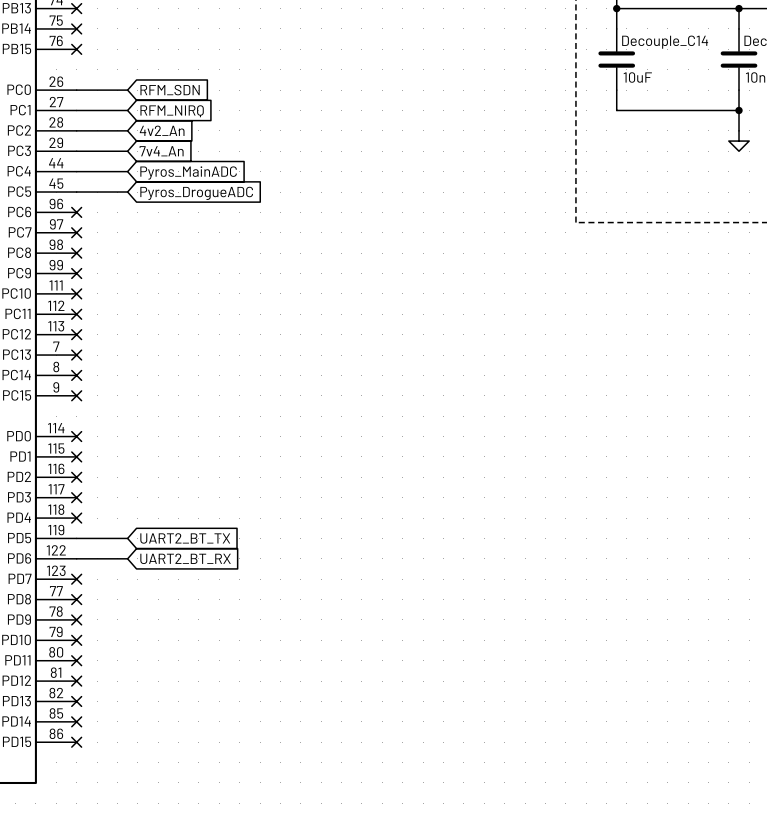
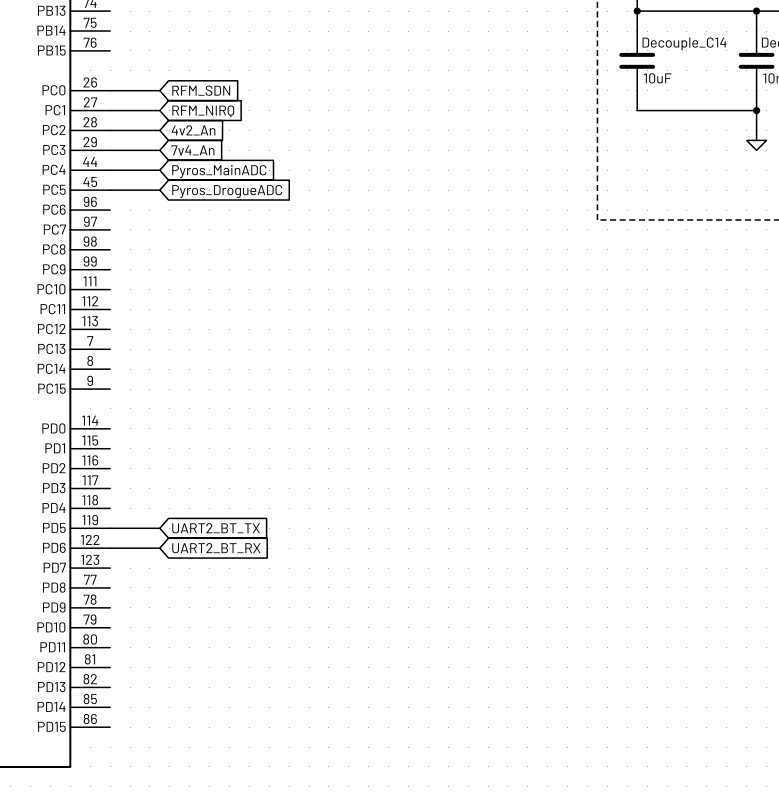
no-connect mark: (76, 8) -> none
no-connect mark: (76, 28) -> none
no-connect mark: (76, 49) -> none
no-connect mark: (76, 212) -> none
no-connect mark: (76, 232) -> none
no-connect mark: (76, 253) -> none
no-connect mark: (76, 273) -> none
no-connect mark: (76, 293) -> none
no-connect mark: (76, 314) -> none
no-connect mark: (76, 334) -> none
no-connect mark: (76, 355) -> none
no-connect mark: (76, 375) -> none
no-connect mark: (76, 395) -> none
no-connect mark: (76, 436) -> none
no-connect mark: (76, 456) -> none
no-connect mark: (76, 477) -> none
no-connect mark: (76, 497) -> none
no-connect mark: (76, 518) -> none
no-connect mark: (76, 579) -> none
no-connect mark: (76, 599) -> none
no-connect mark: (76, 619) -> none
no-connect mark: (76, 640) -> none
no-connect mark: (76, 660) -> none
no-connect mark: (76, 681) -> none
no-connect mark: (76, 701) -> none
no-connect mark: (76, 721) -> none
no-connect mark: (76, 742) -> none

